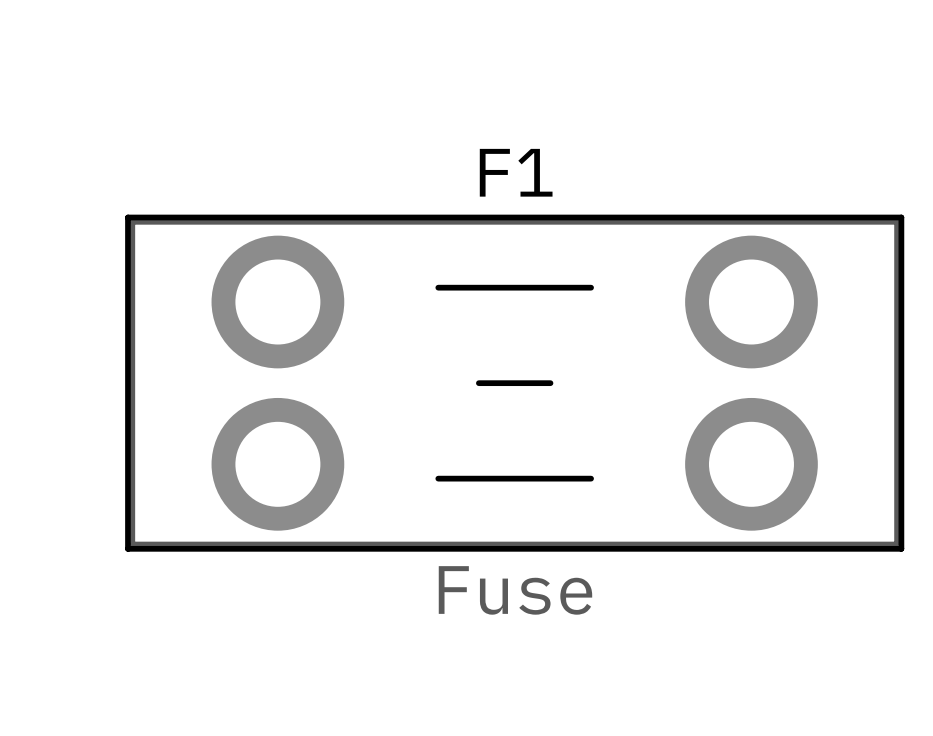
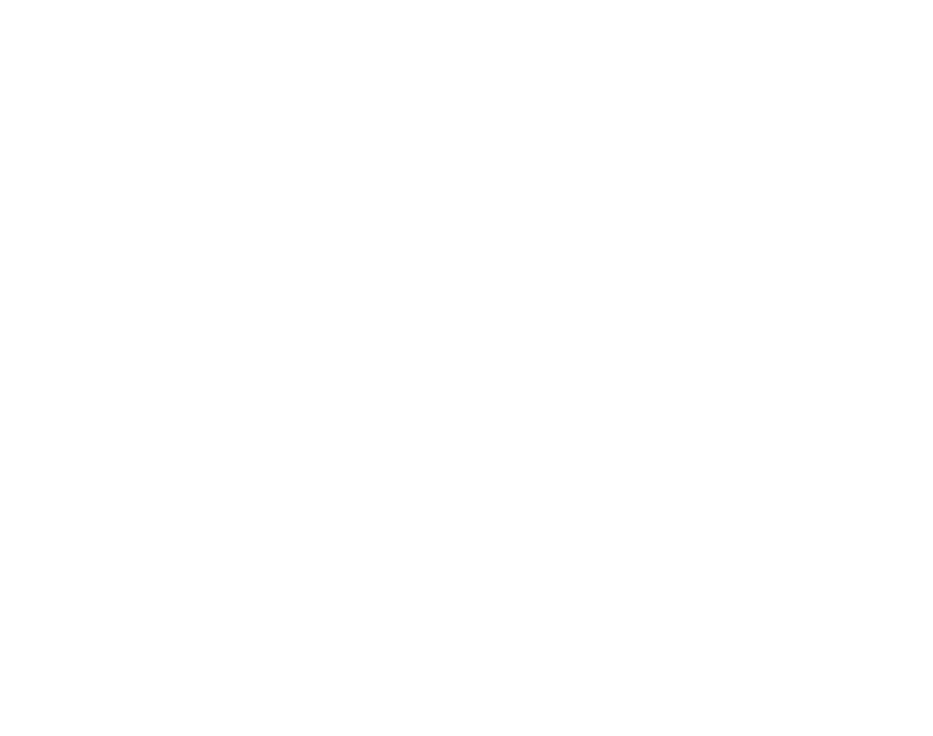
F1: Fuse (514, 383) -> none

